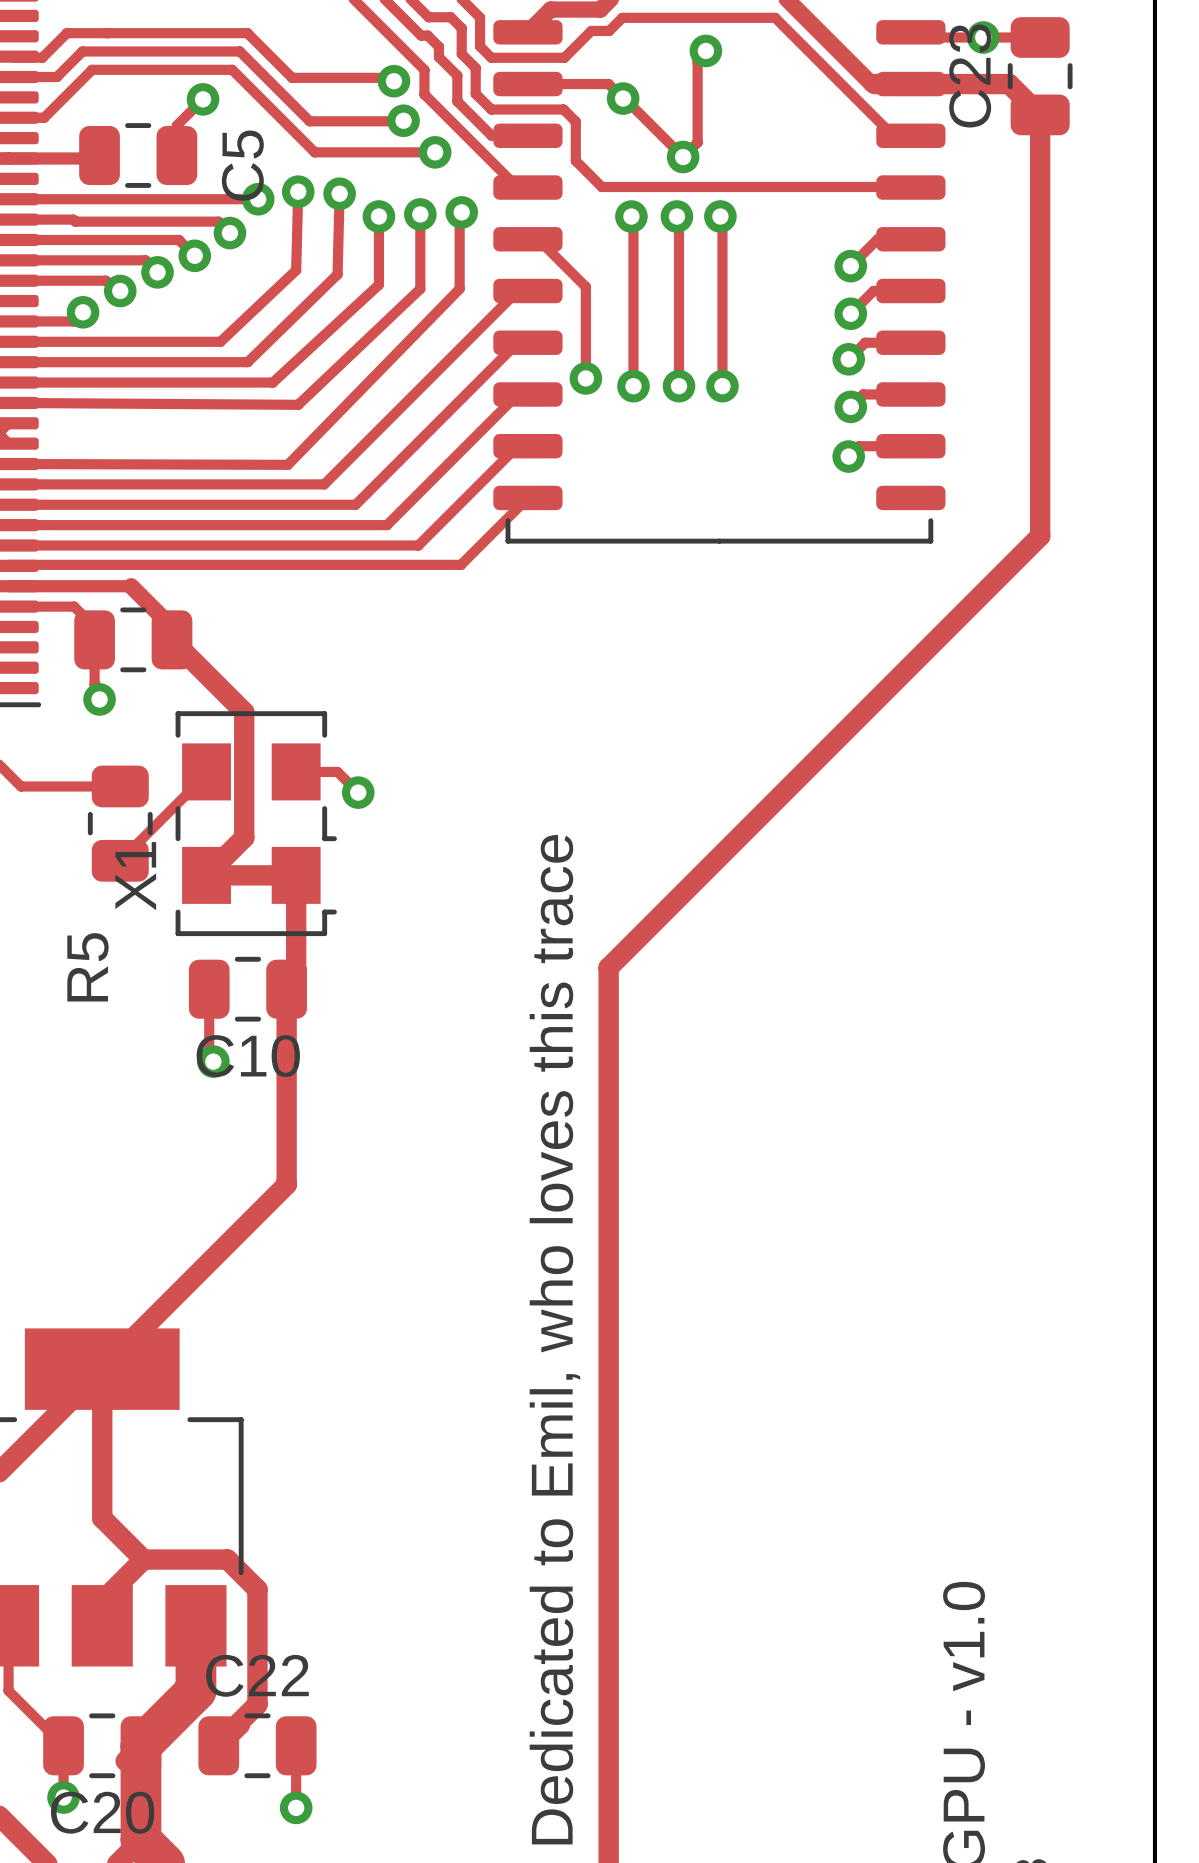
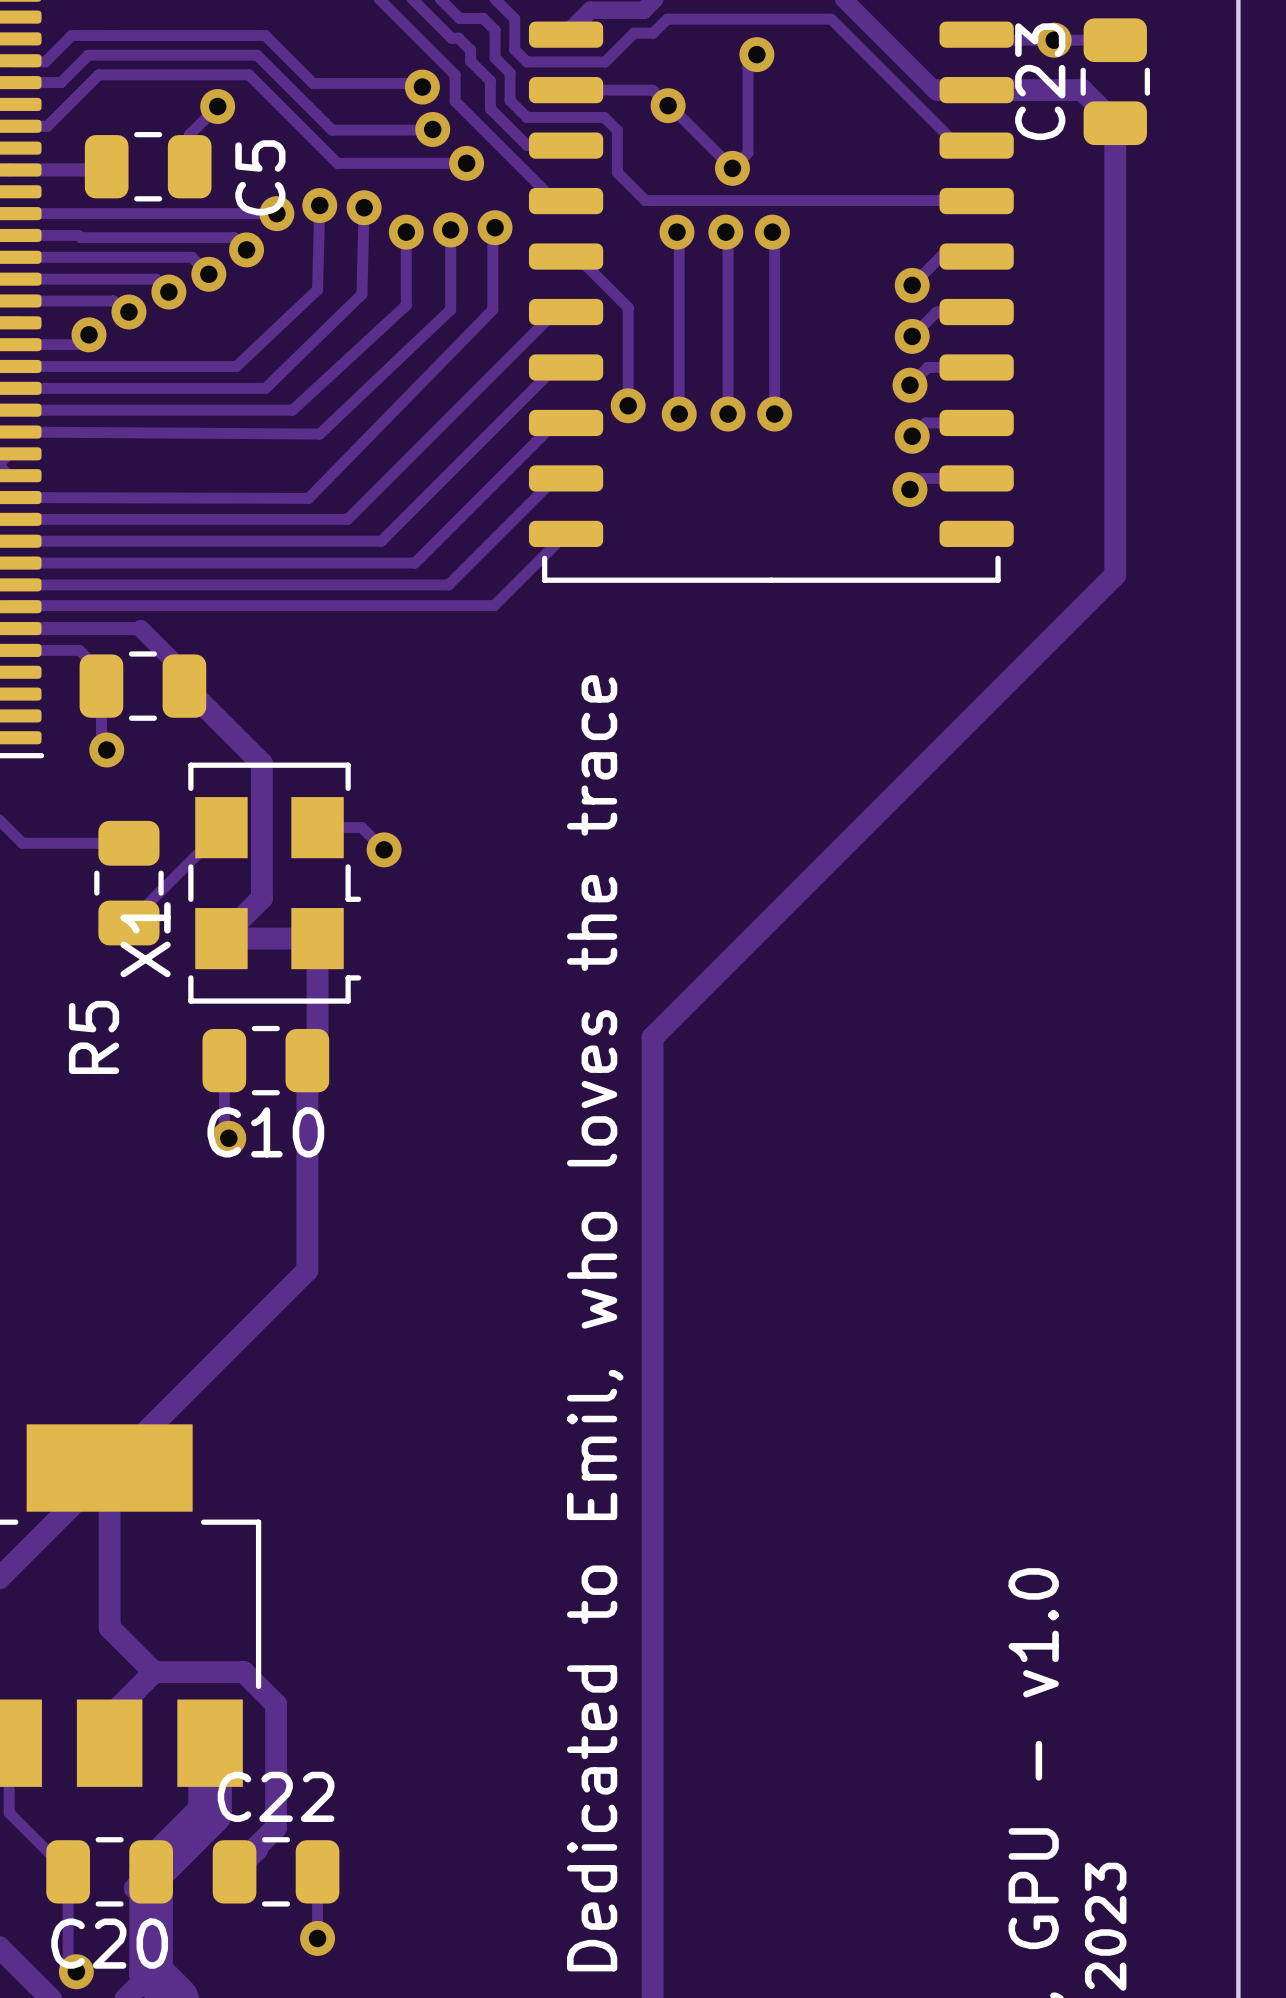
text: Dedicated to Emil, who loves this trace (554, 1339) -> Dedicated to Emil, who loves the trace (595, 1323)
track: none -> (68, 1927) (68, 1963) (76, 1971)
via position: (63, 1797) -> (76, 1971)

